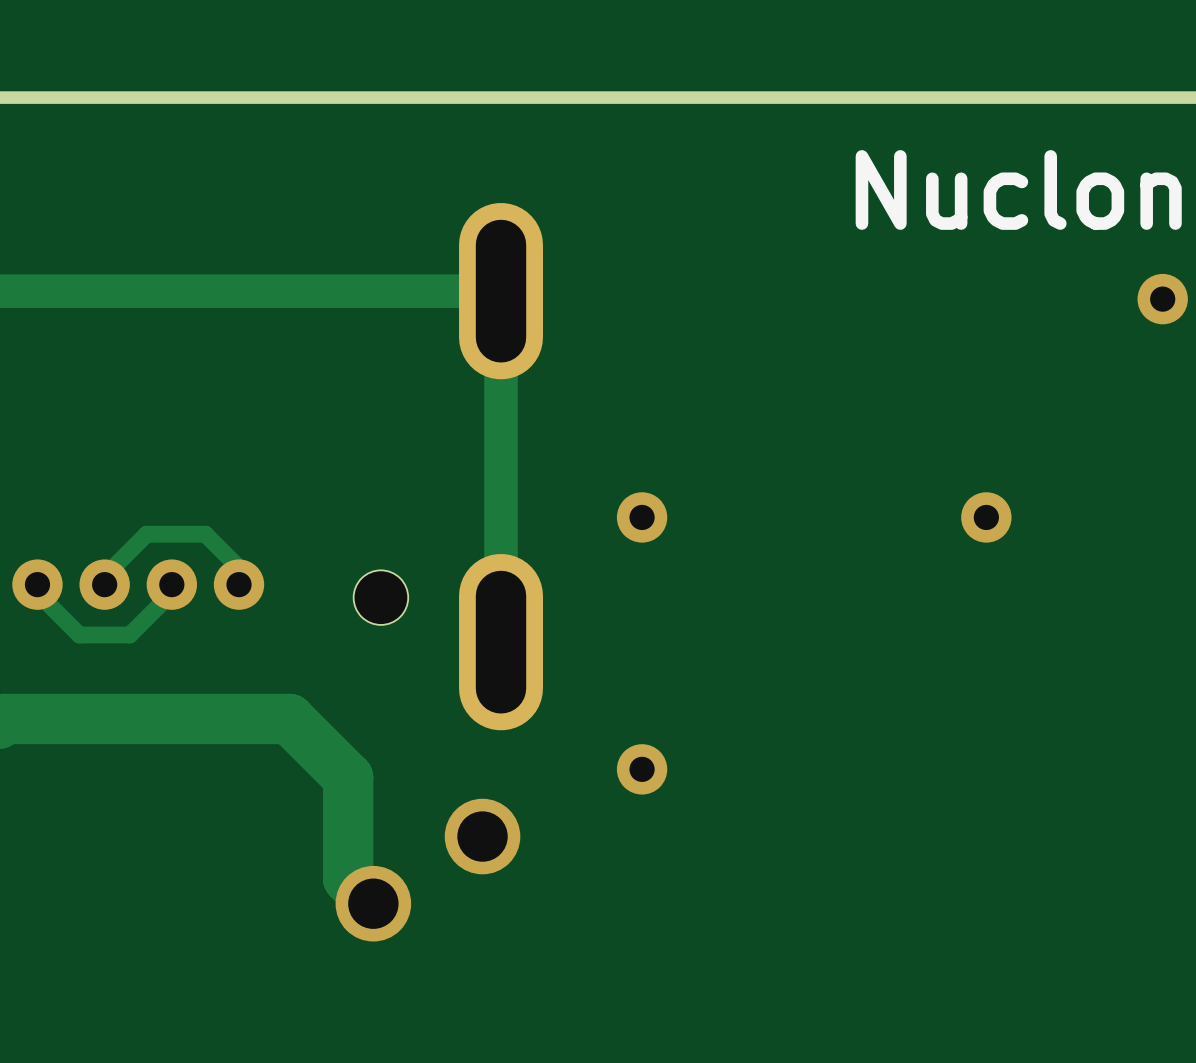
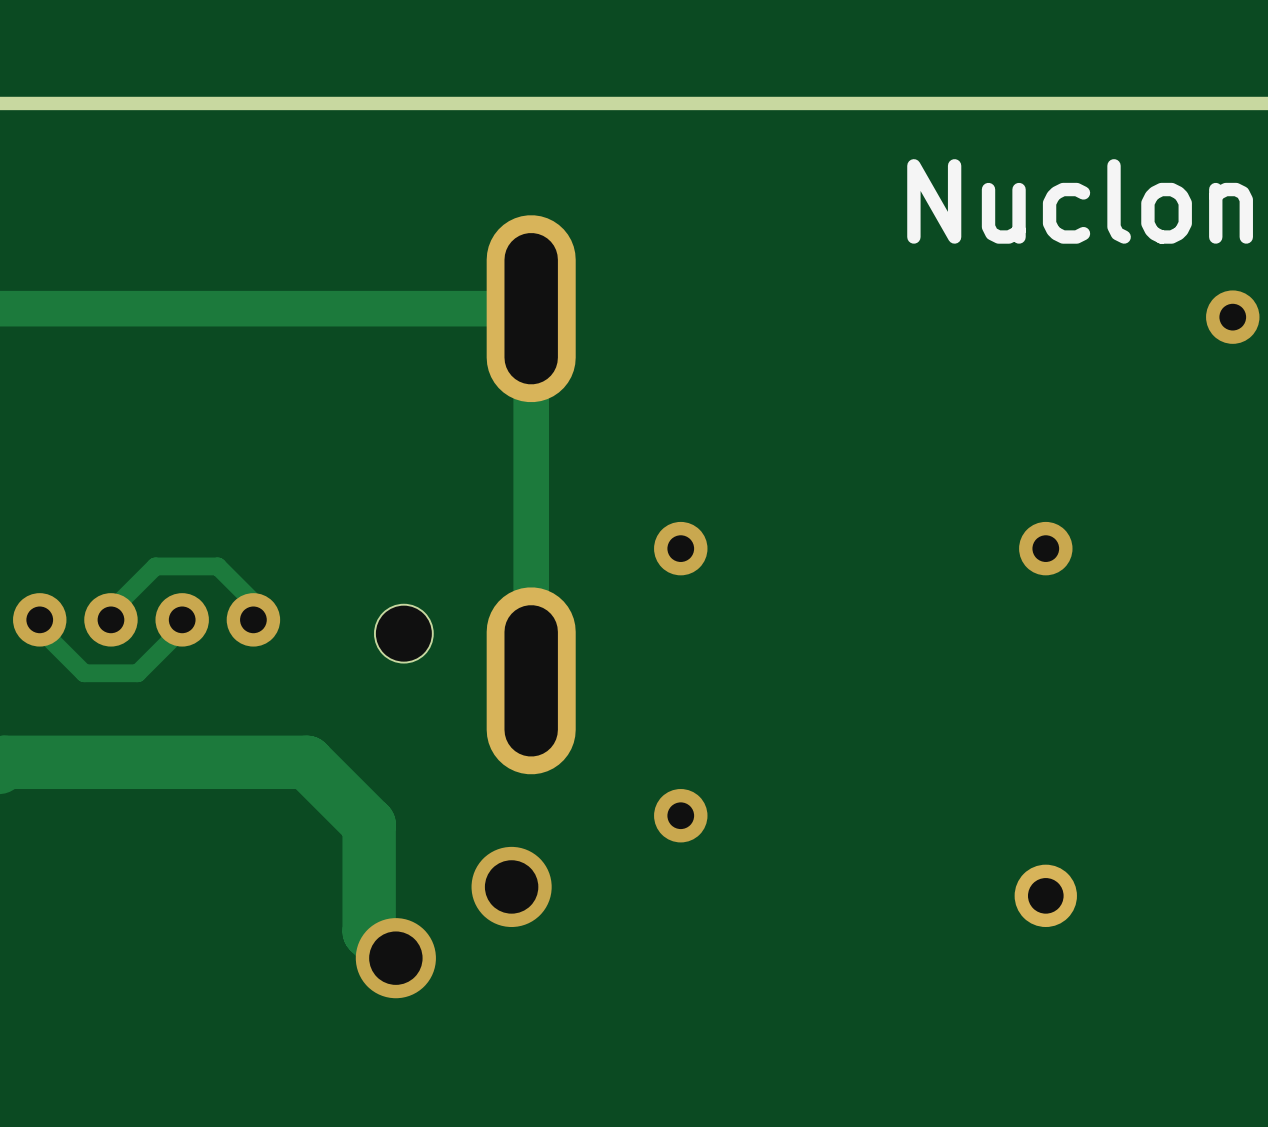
part: none -> (1045, 895)

